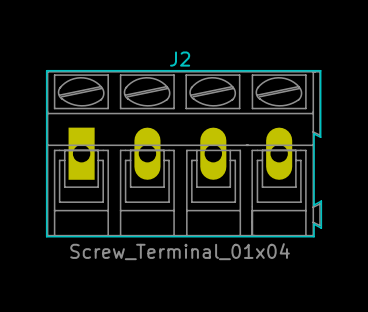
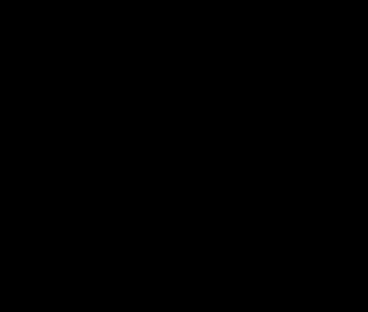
J2: Screw_Terminal_01x04 (184, 153) -> none

